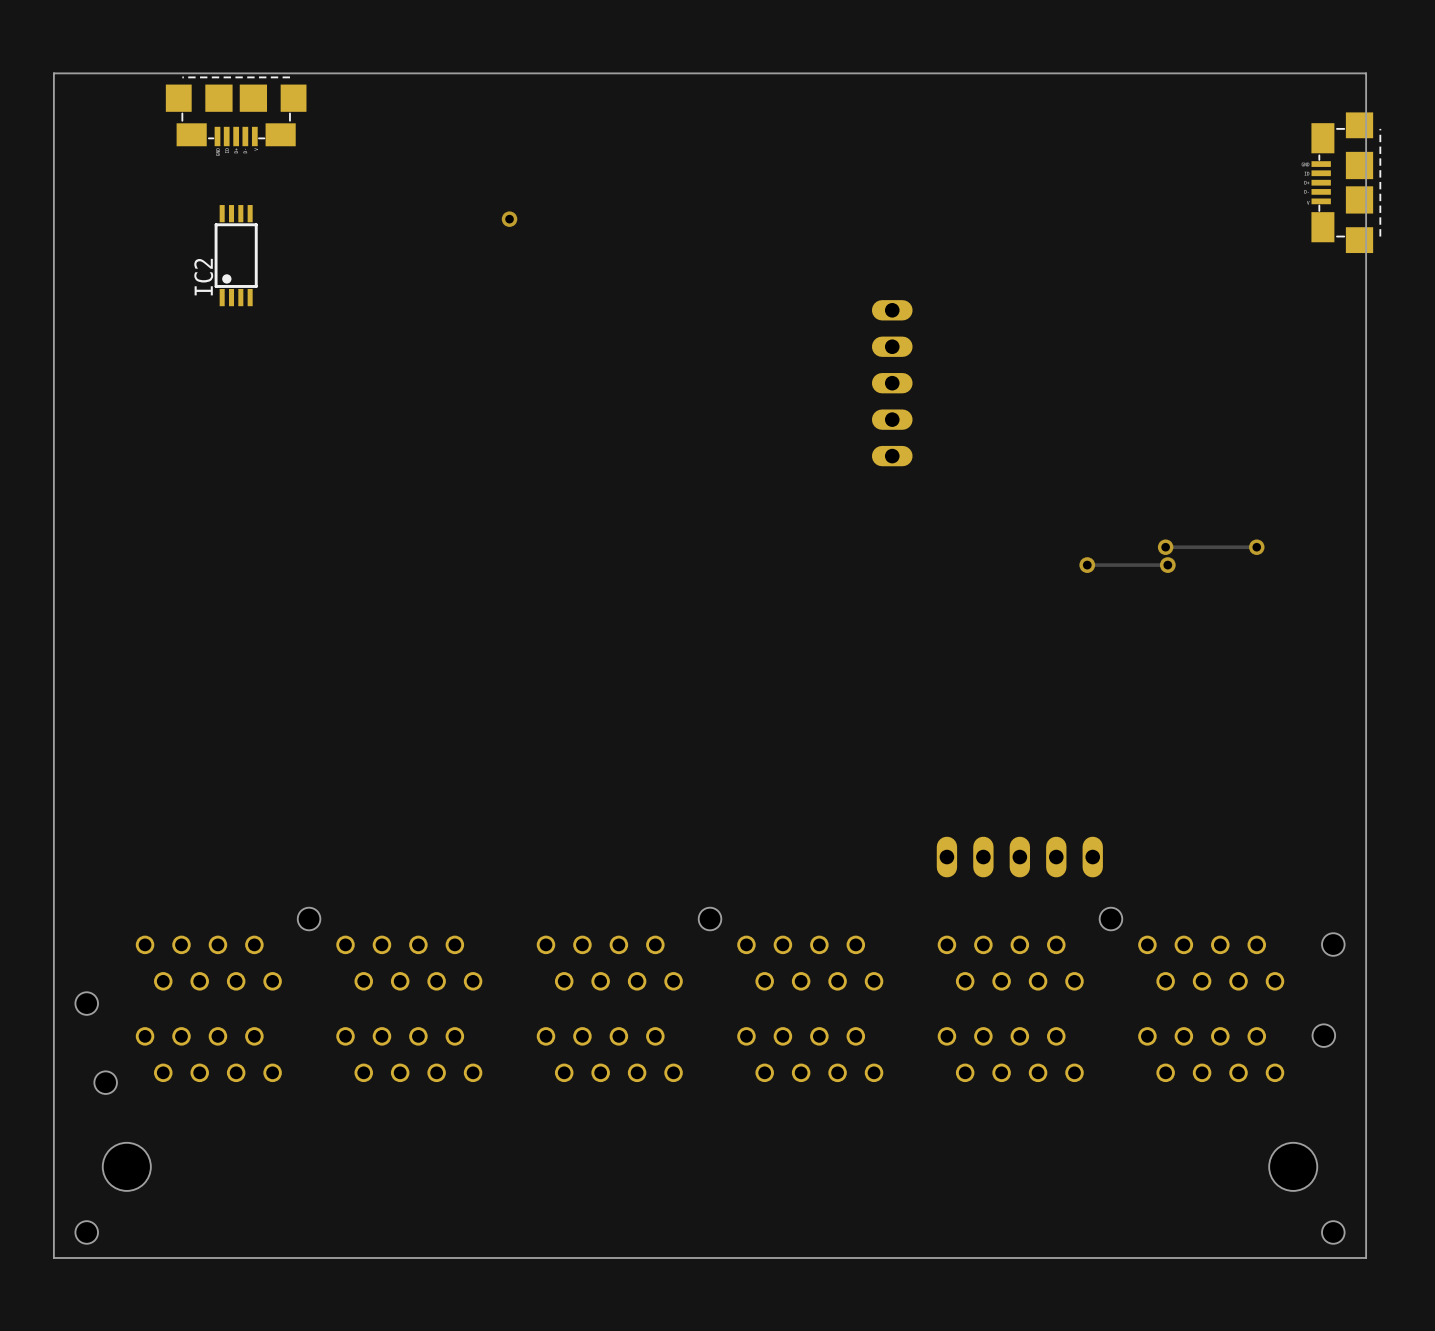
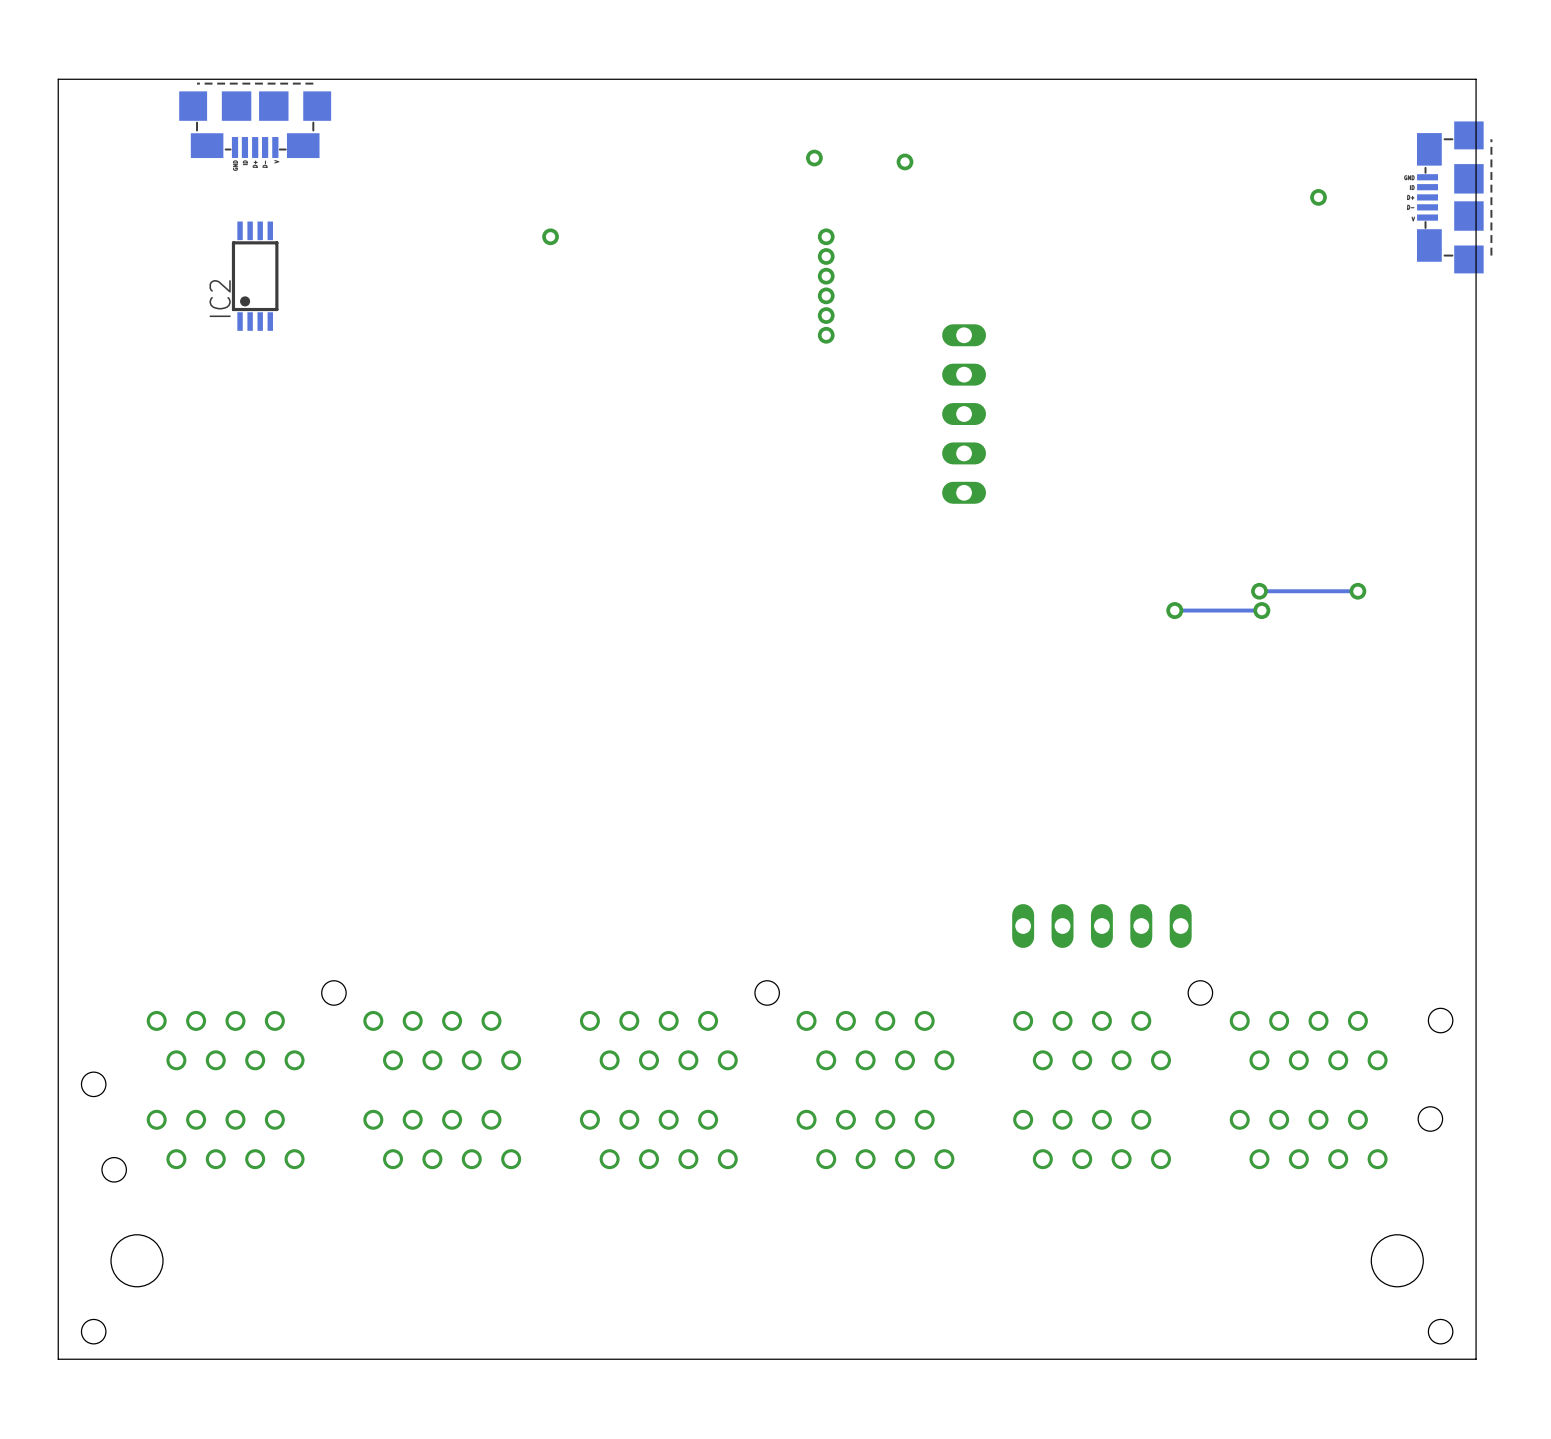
via: none -> (814, 158)
via: none -> (905, 161)
via: none -> (1318, 197)
via: none -> (826, 236)
via: none -> (826, 256)
via: none -> (826, 276)
via: none -> (826, 295)
via: none -> (826, 315)
via: none -> (826, 335)

